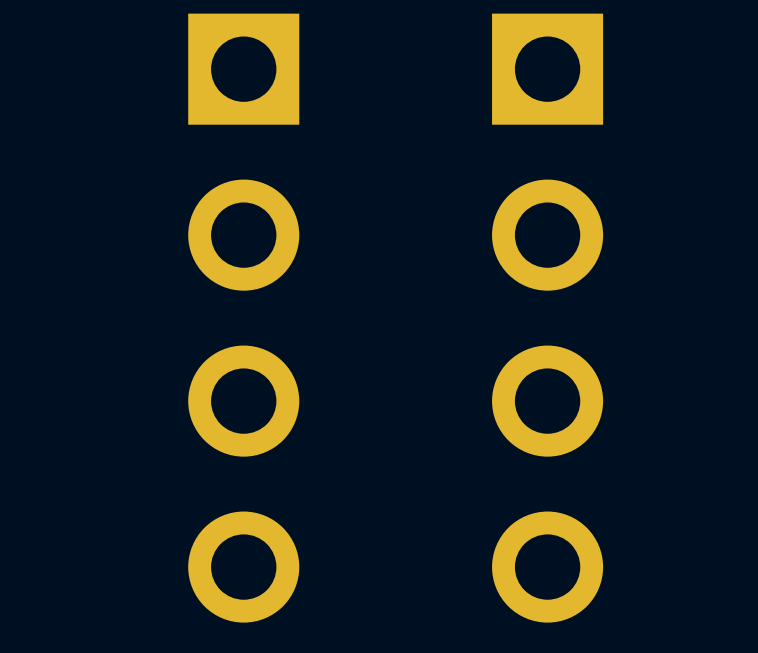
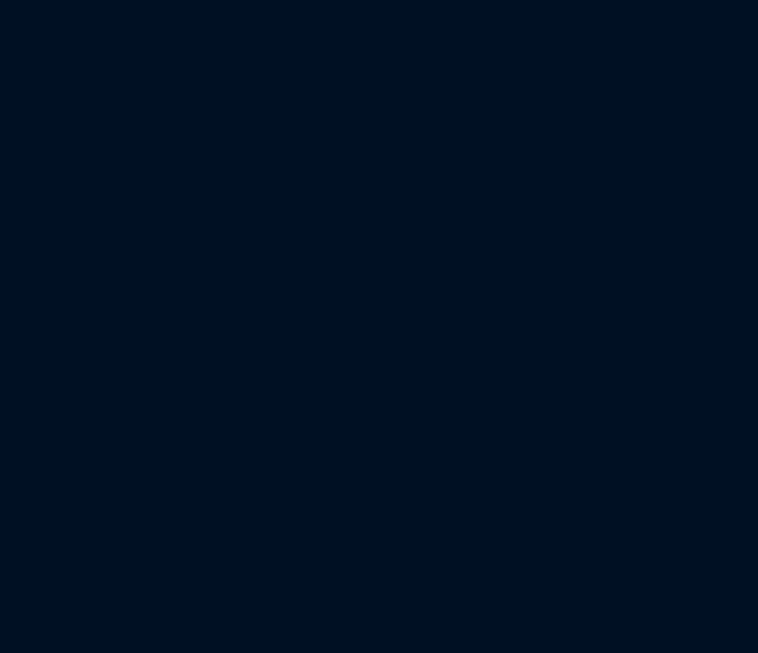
part: (243, 318) -> none
part: (547, 318) -> none

